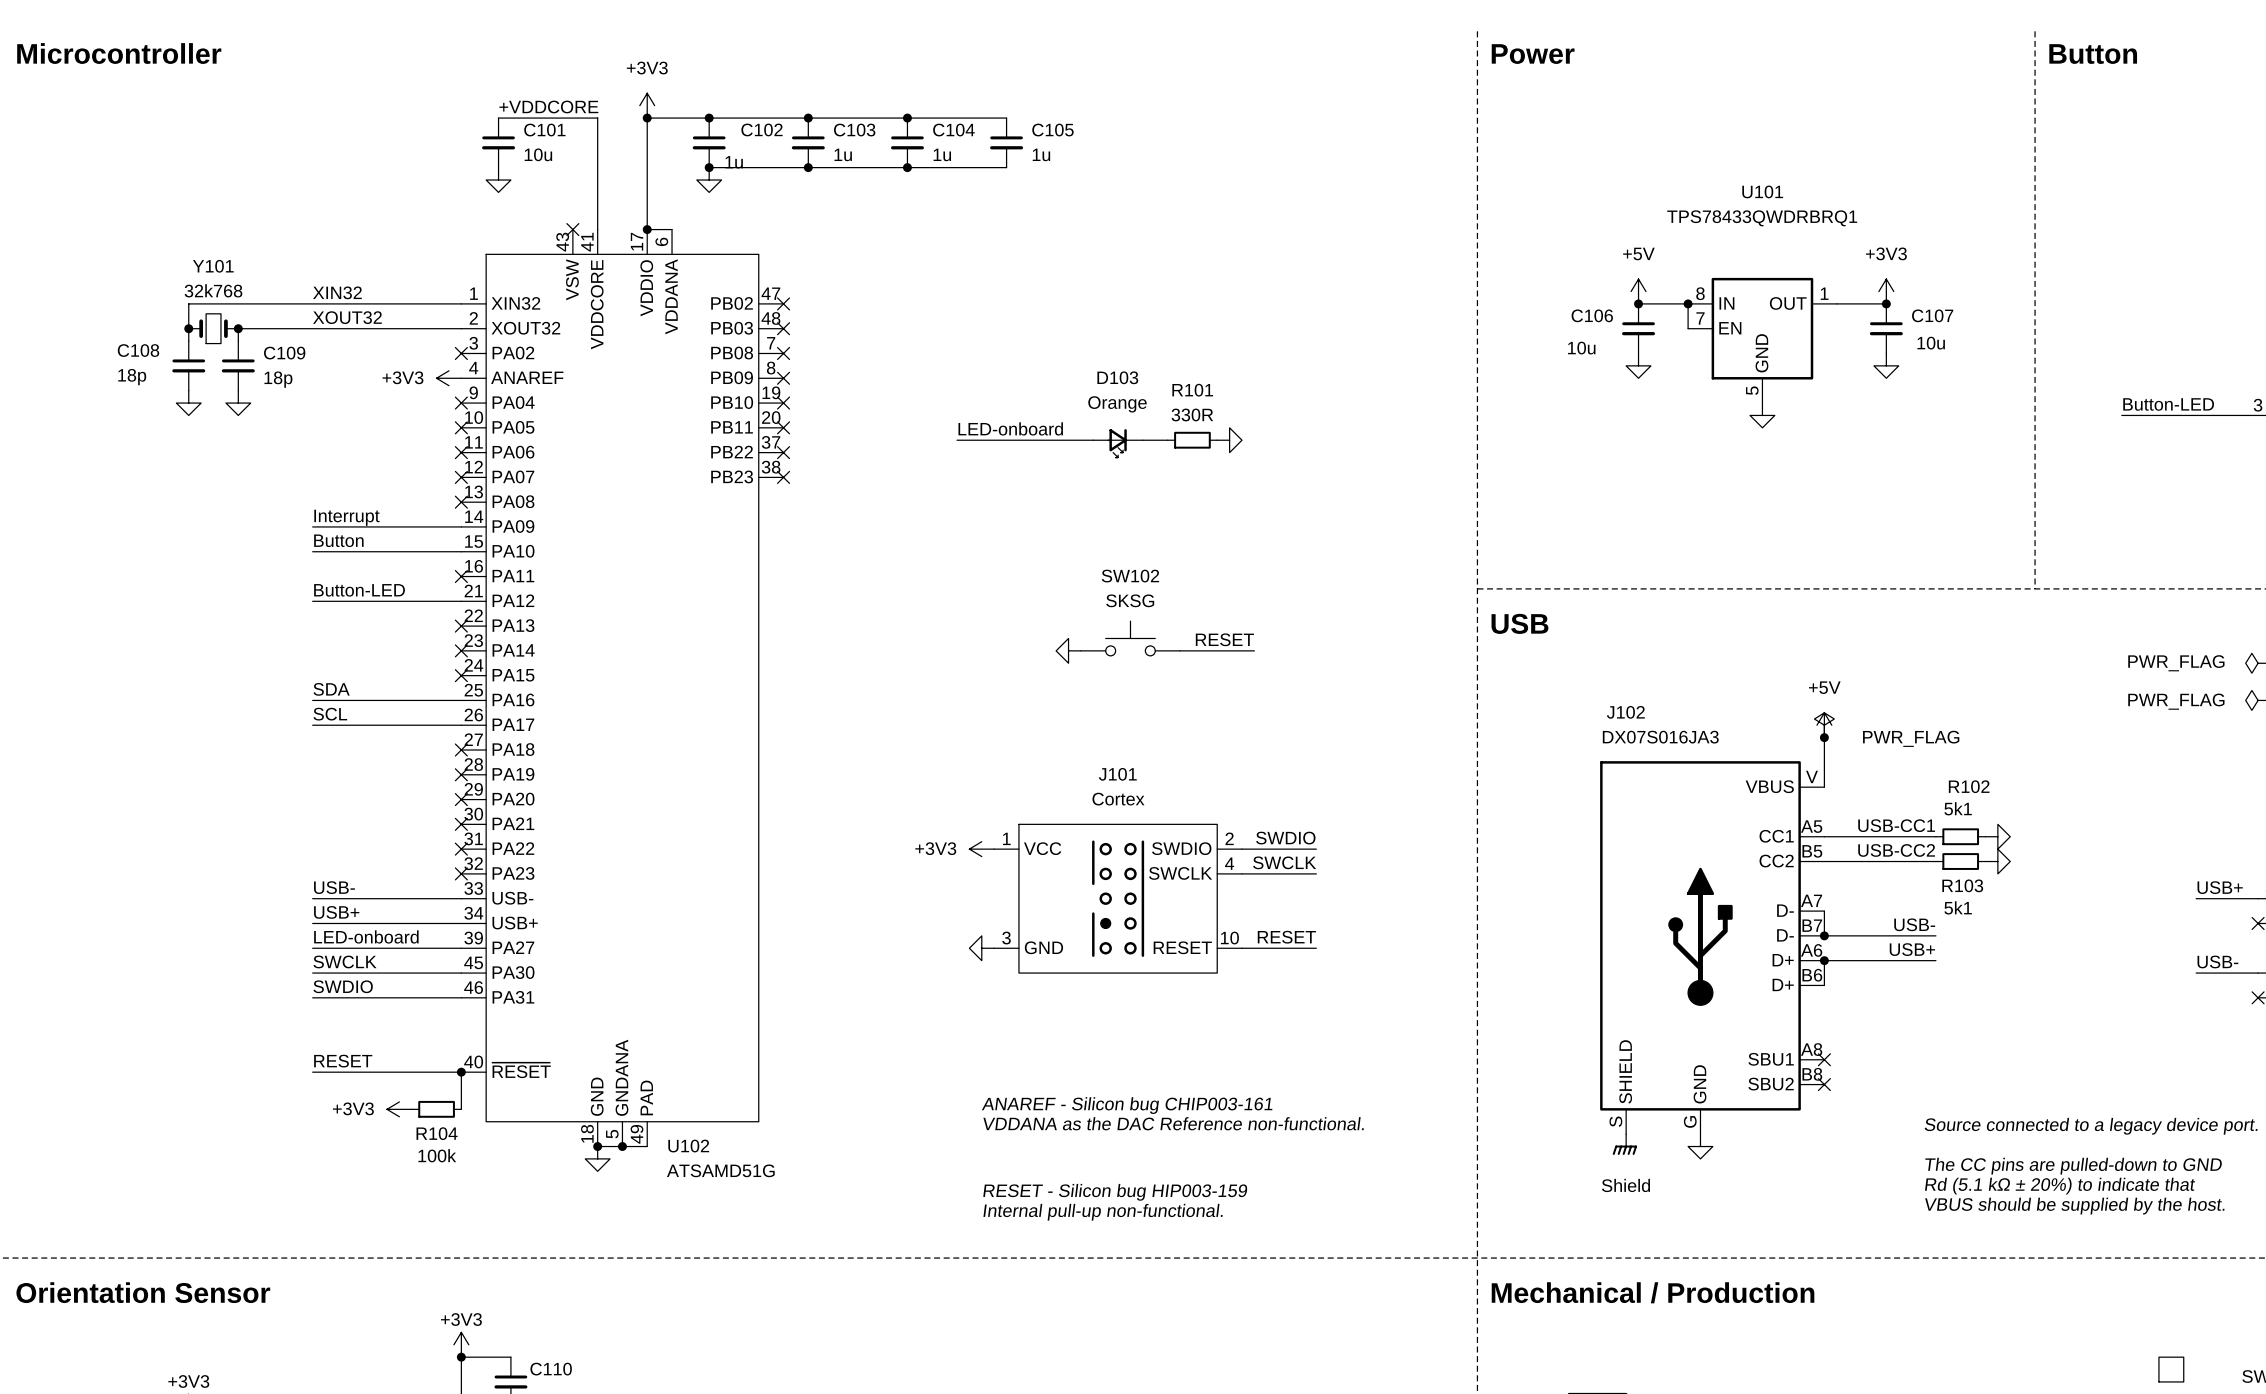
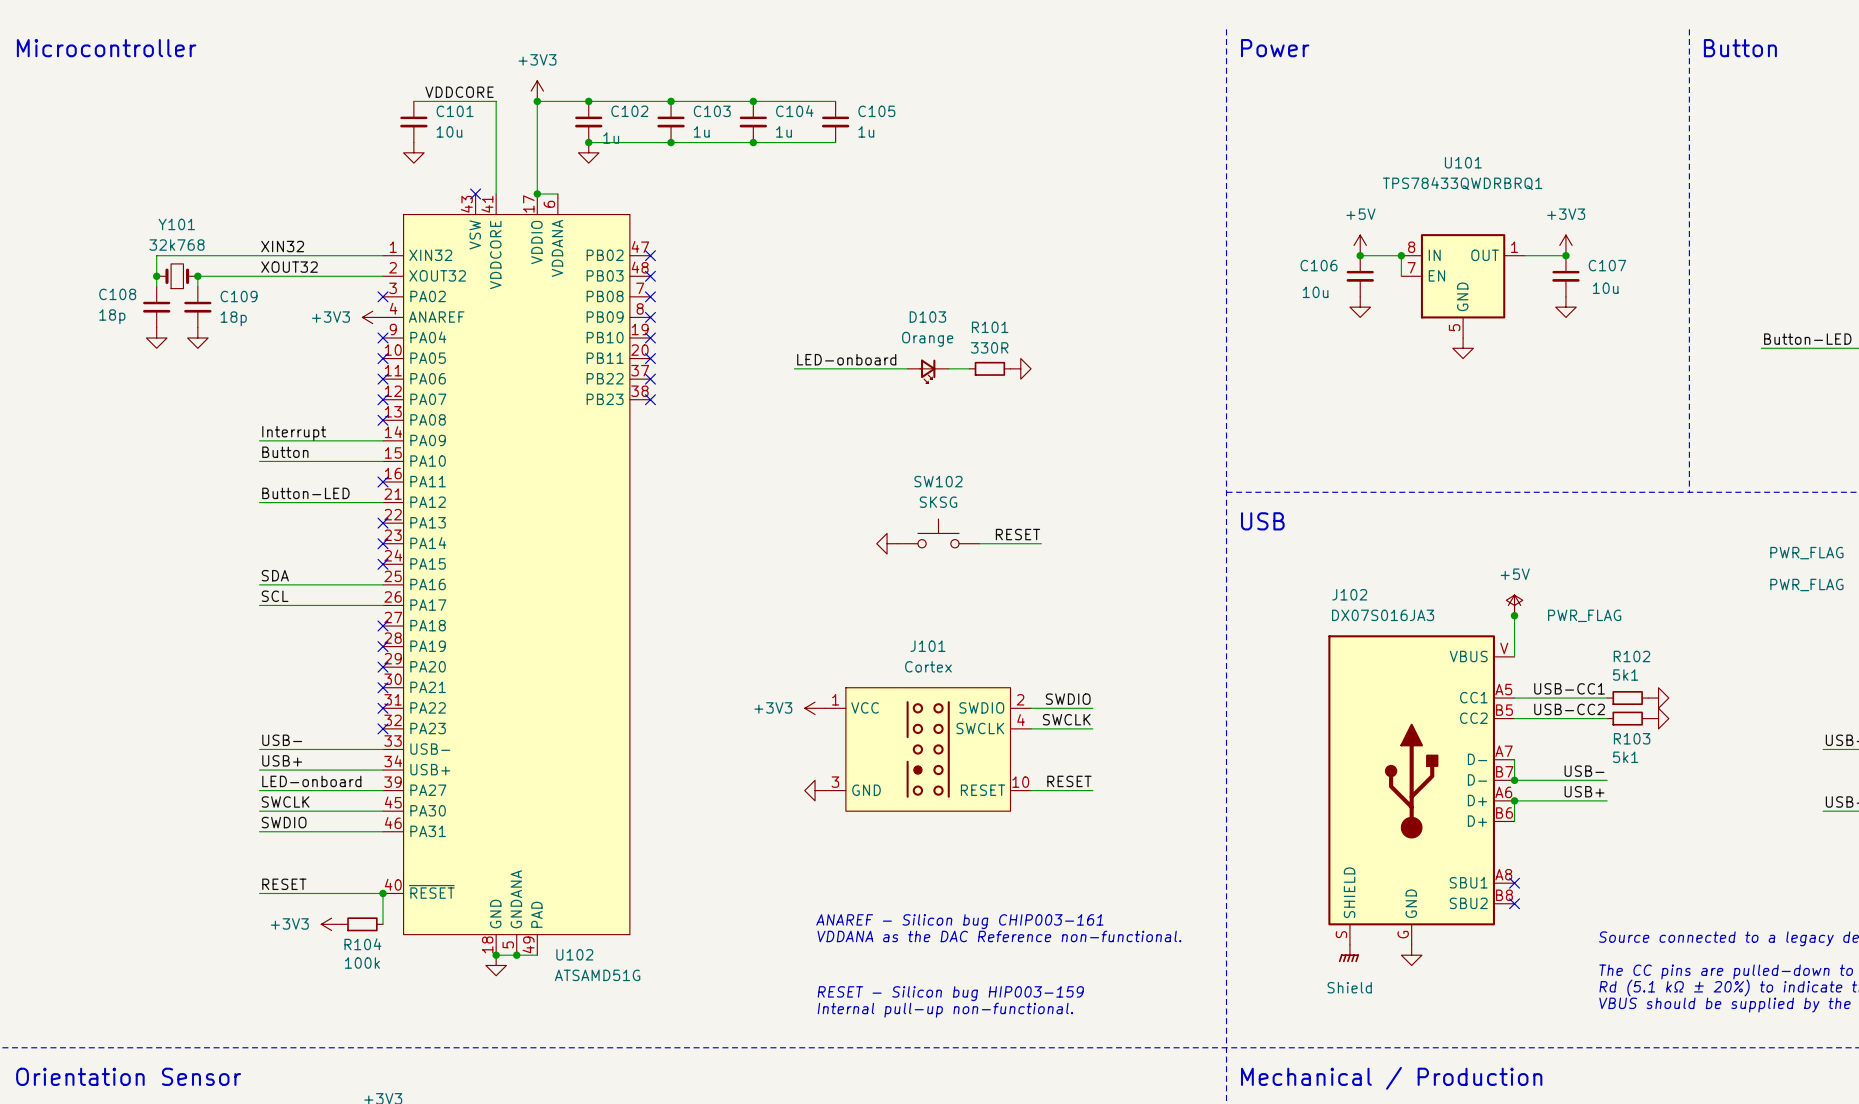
label: +VDDCORE (548, 106) -> VDDCORE (459, 92)

